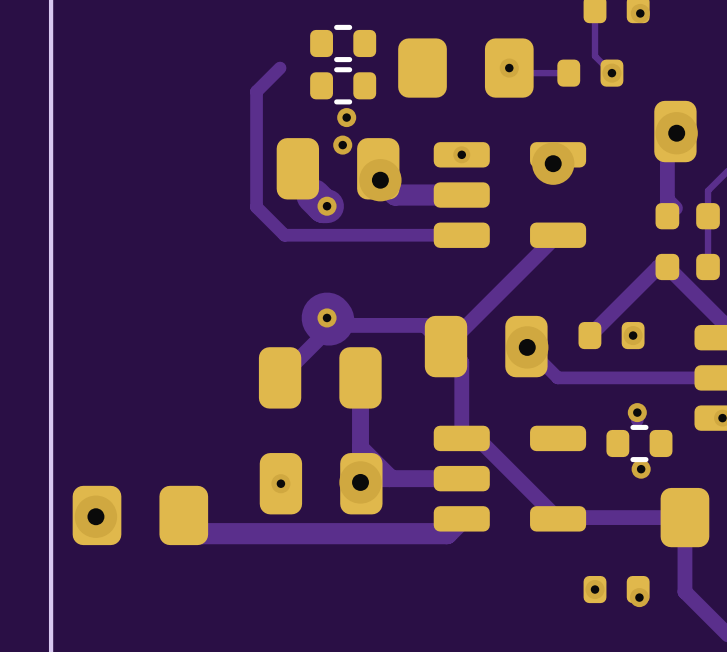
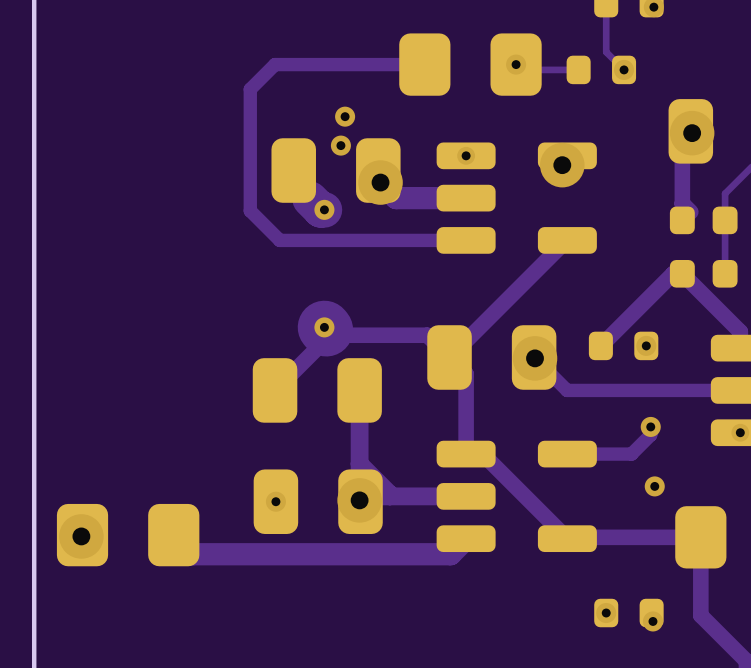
part: (343, 43) -> none
track: none -> (275, 64) (424, 64)
part: (343, 85) -> none
track: none -> (650, 434) (631, 454) (567, 454)
part: (639, 443) -> none

